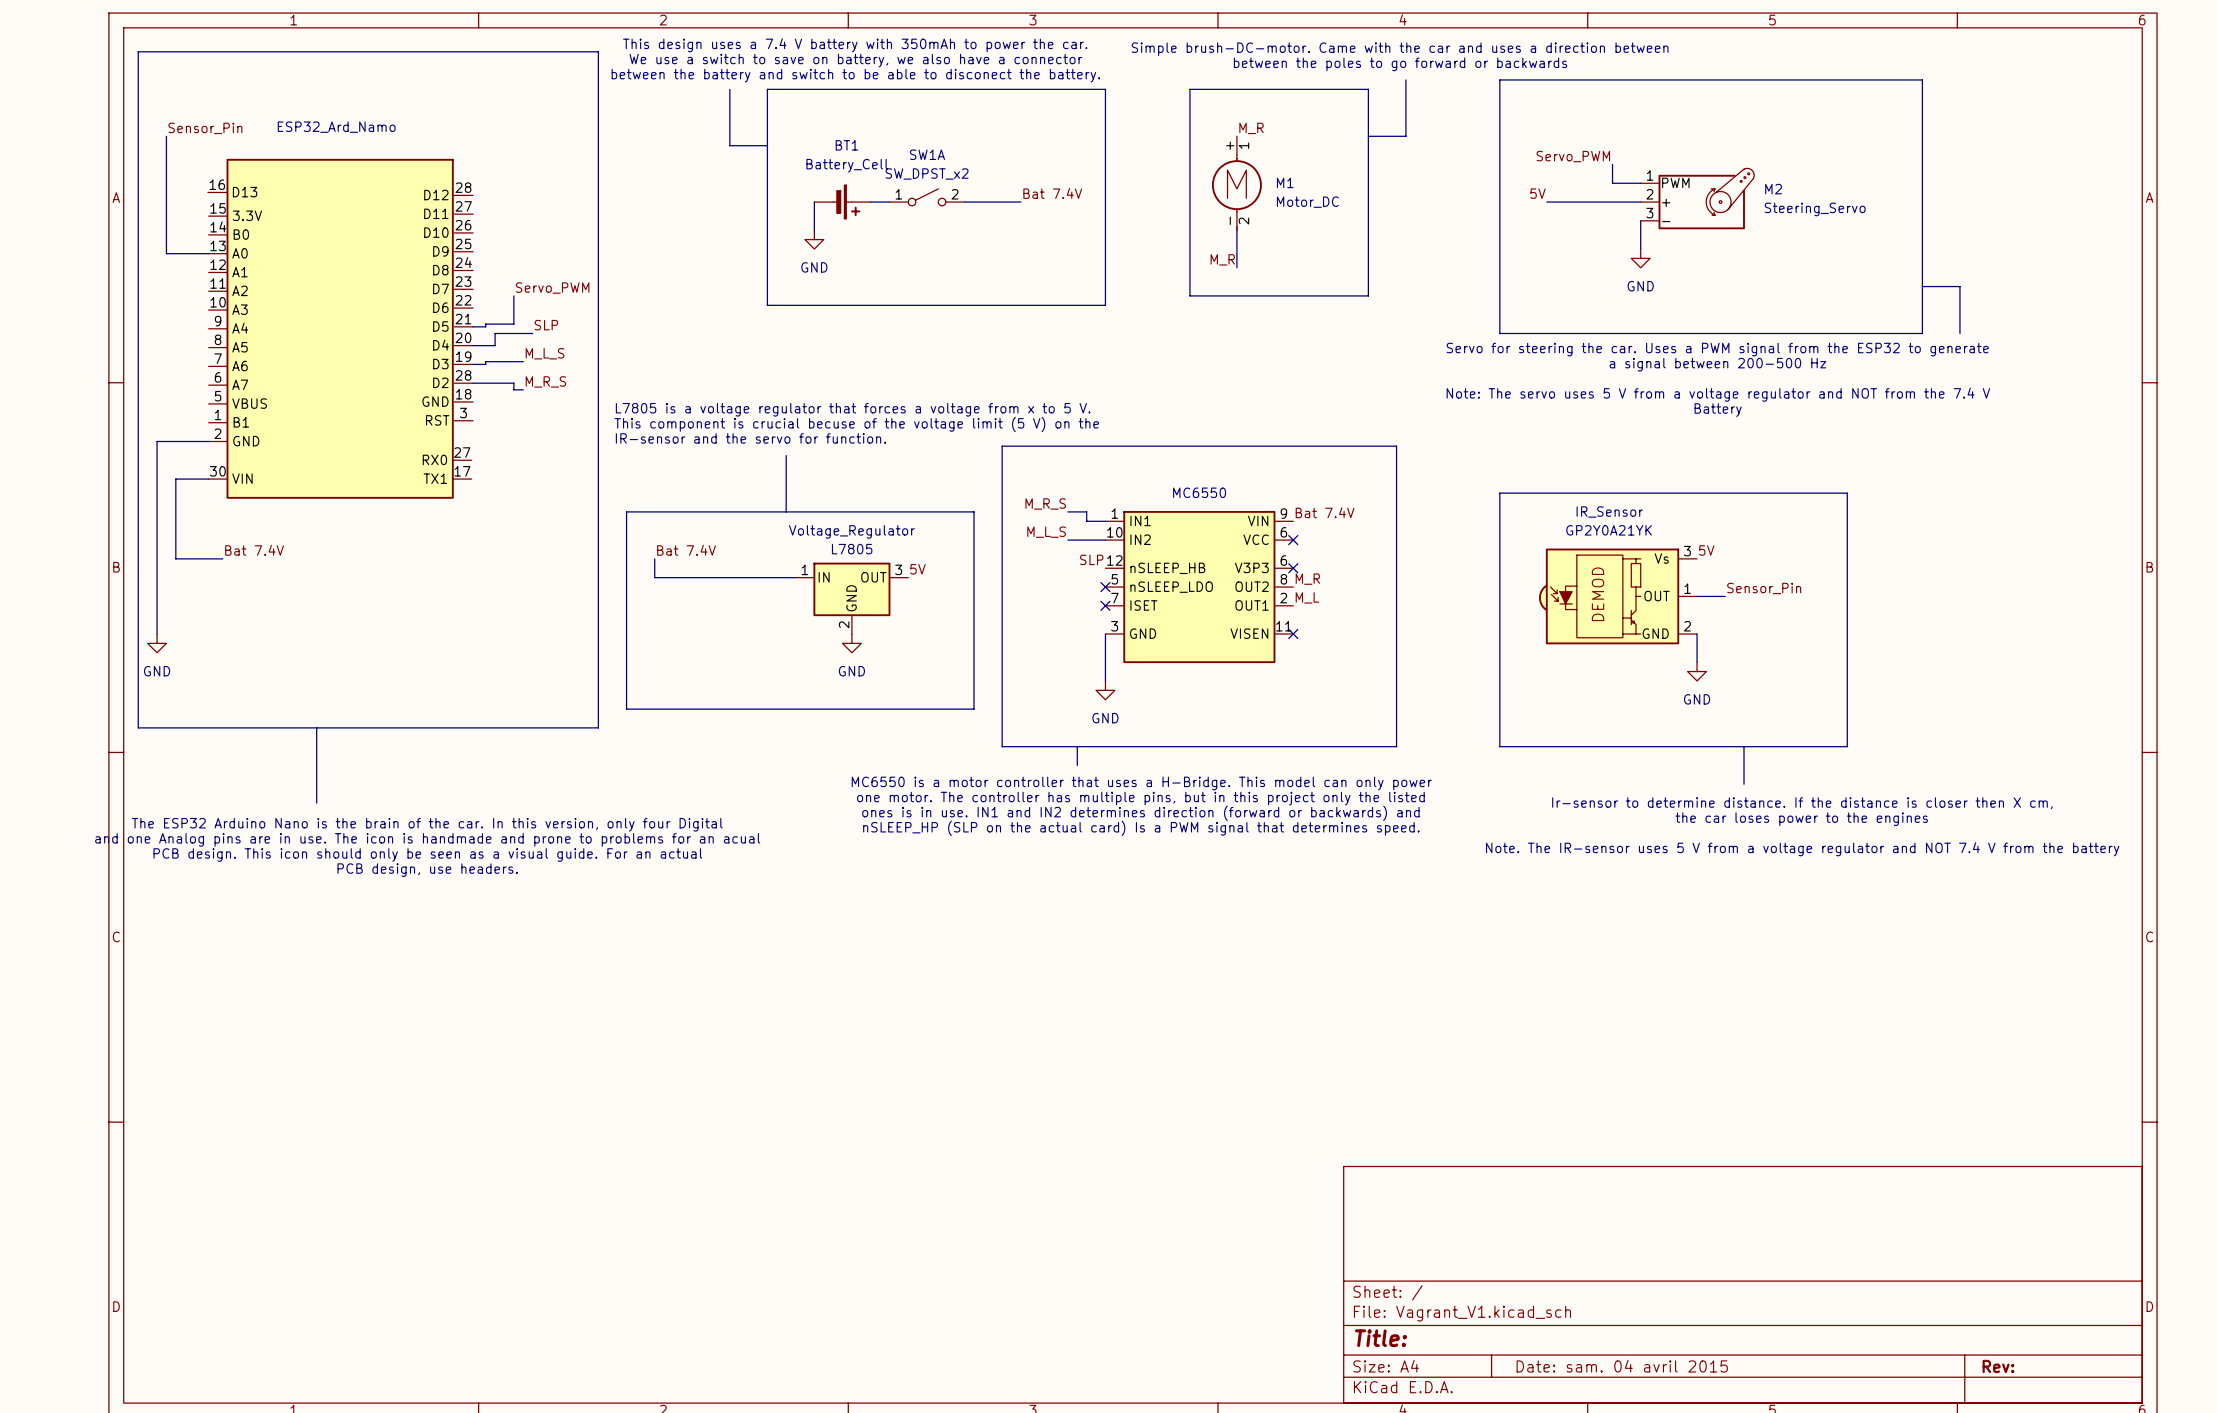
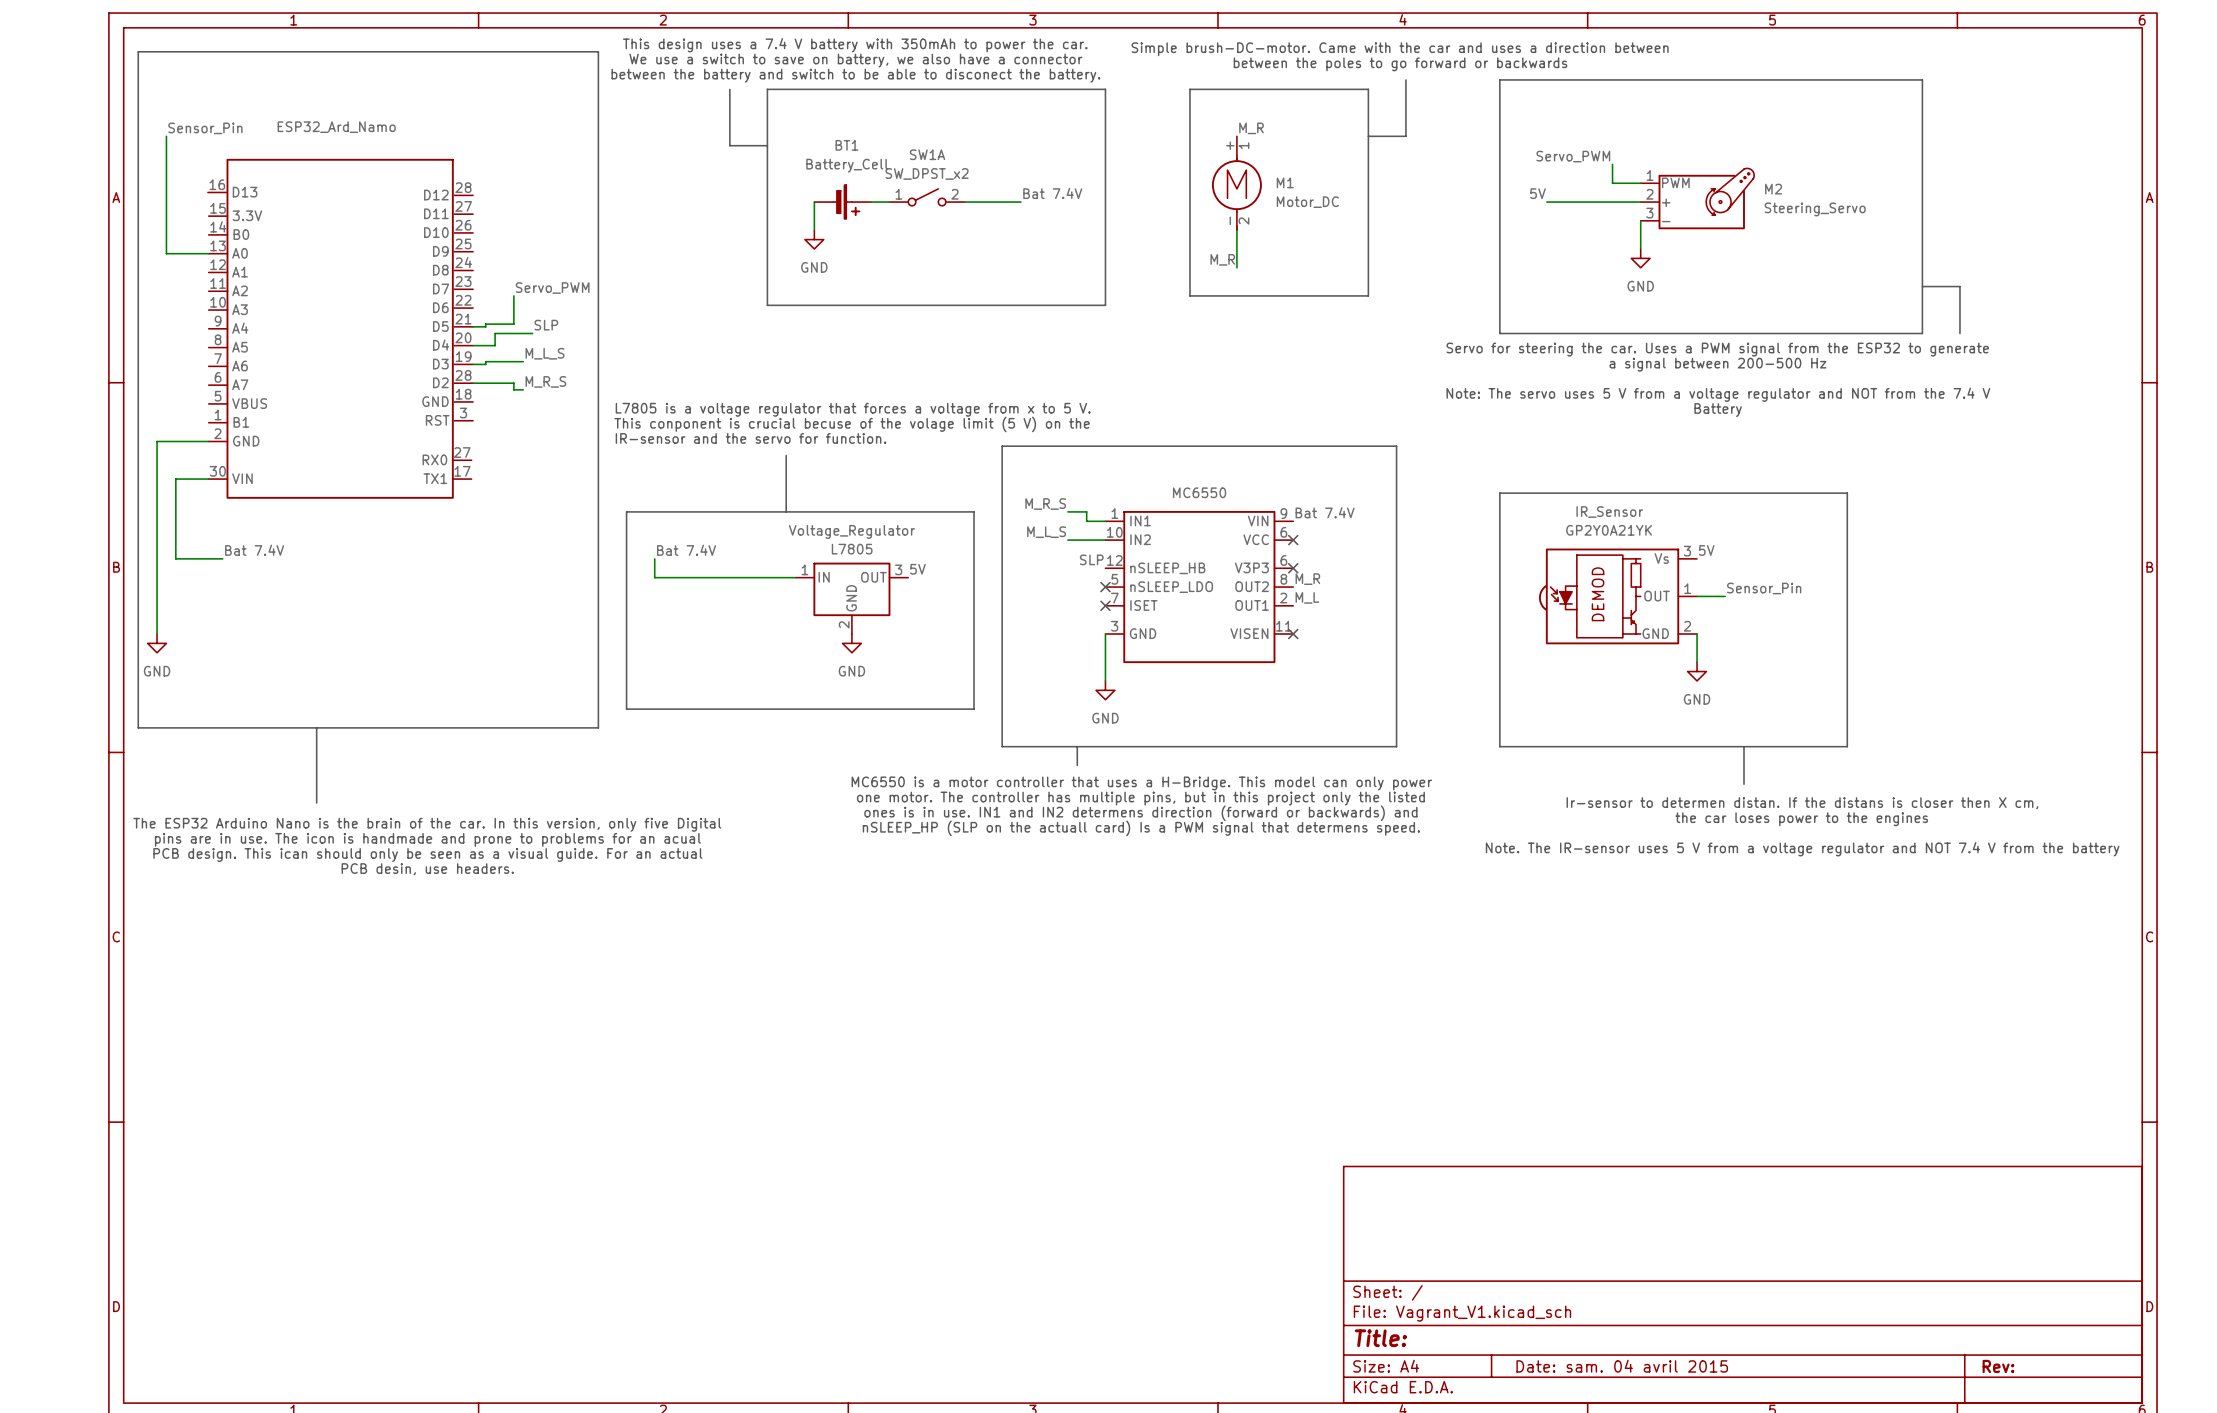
text: This component is crucial becuse of the voltage limit (5 V) on the (856, 424) -> This conponent is crucial becuse of the volage limit (5 V) on the (852, 424)
text: Ir-sensor to determine distance. If the distance is closer then X cm, (1802, 803) -> Ir-sensor to determen distan. If the distans is closer then X cm, (1802, 803)
text: ones is in use. IN1 and IN2 determines direction (forward or backwards) and (1140, 813) -> ones is in use. IN1 and IN2 determens direction (forward or backwards) and (1140, 813)
text: The ESP32 Arduino Nano is the brain of the car. In this version, only four Digital (427, 824) -> The ESP32 Arduino Nano is the brain of the car. In this version, only five Digital (427, 824)
text: nSLEEP_HP (SLP on the actual card) Is a PWM signal that determines speed. (1141, 828) -> nSLEEP_HP (SLP on the actuall card) Is a PWM signal that determens speed. (1141, 828)
text: and one Analog pins are in use. The icon is handmade and prone to problems for an acual (427, 839) -> pins are in use. The icon is handmade and prone to problems for an acual (427, 839)
text: PCB design. This icon should only be seen as a visual guide. For an actual (427, 855) -> PCB design. This ican should only be seen as a visual guide. For an actual (427, 855)
text: PCB design, use headers. (427, 870) -> PCB desin, use headers. (427, 869)

